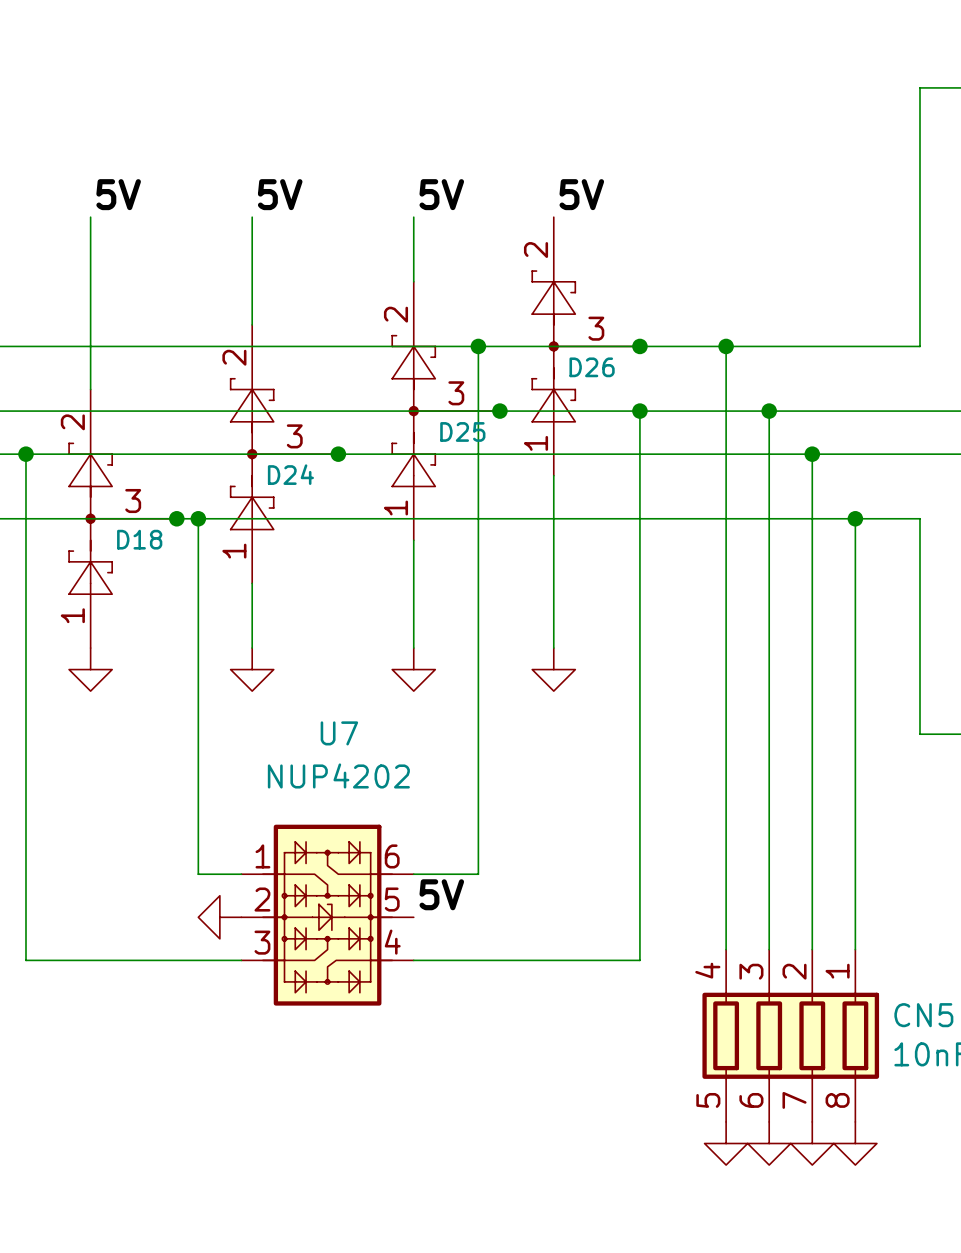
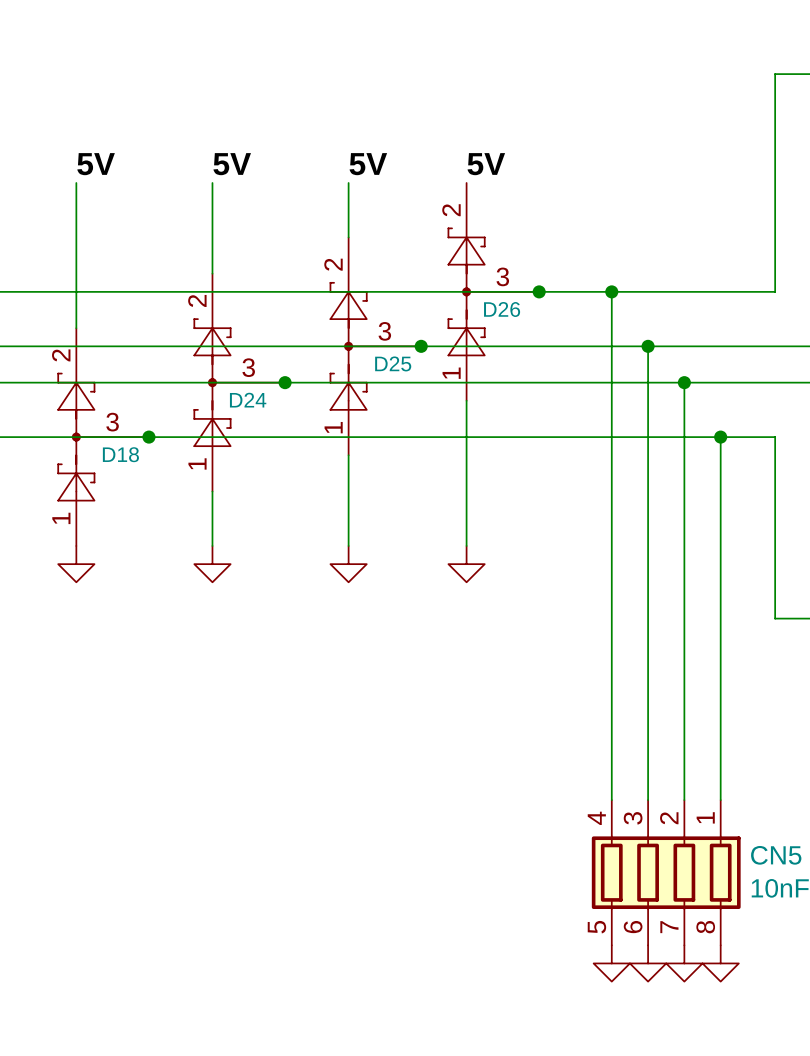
wire: (478, 346) (478, 874) (413, 874) -> none
junction: (478, 346) -> none
wire: (639, 411) (639, 960) (413, 960) -> none
junction: (639, 411) -> none
wire: (25, 454) (25, 960) (241, 960) -> none
junction: (25, 454) -> none
wire: (198, 518) (198, 874) (241, 874) -> none
junction: (198, 518) -> none
label: 5V (441, 894) -> none
U7: NUP4202 (327, 915) -> none
power symbol: (219, 917) -> none

